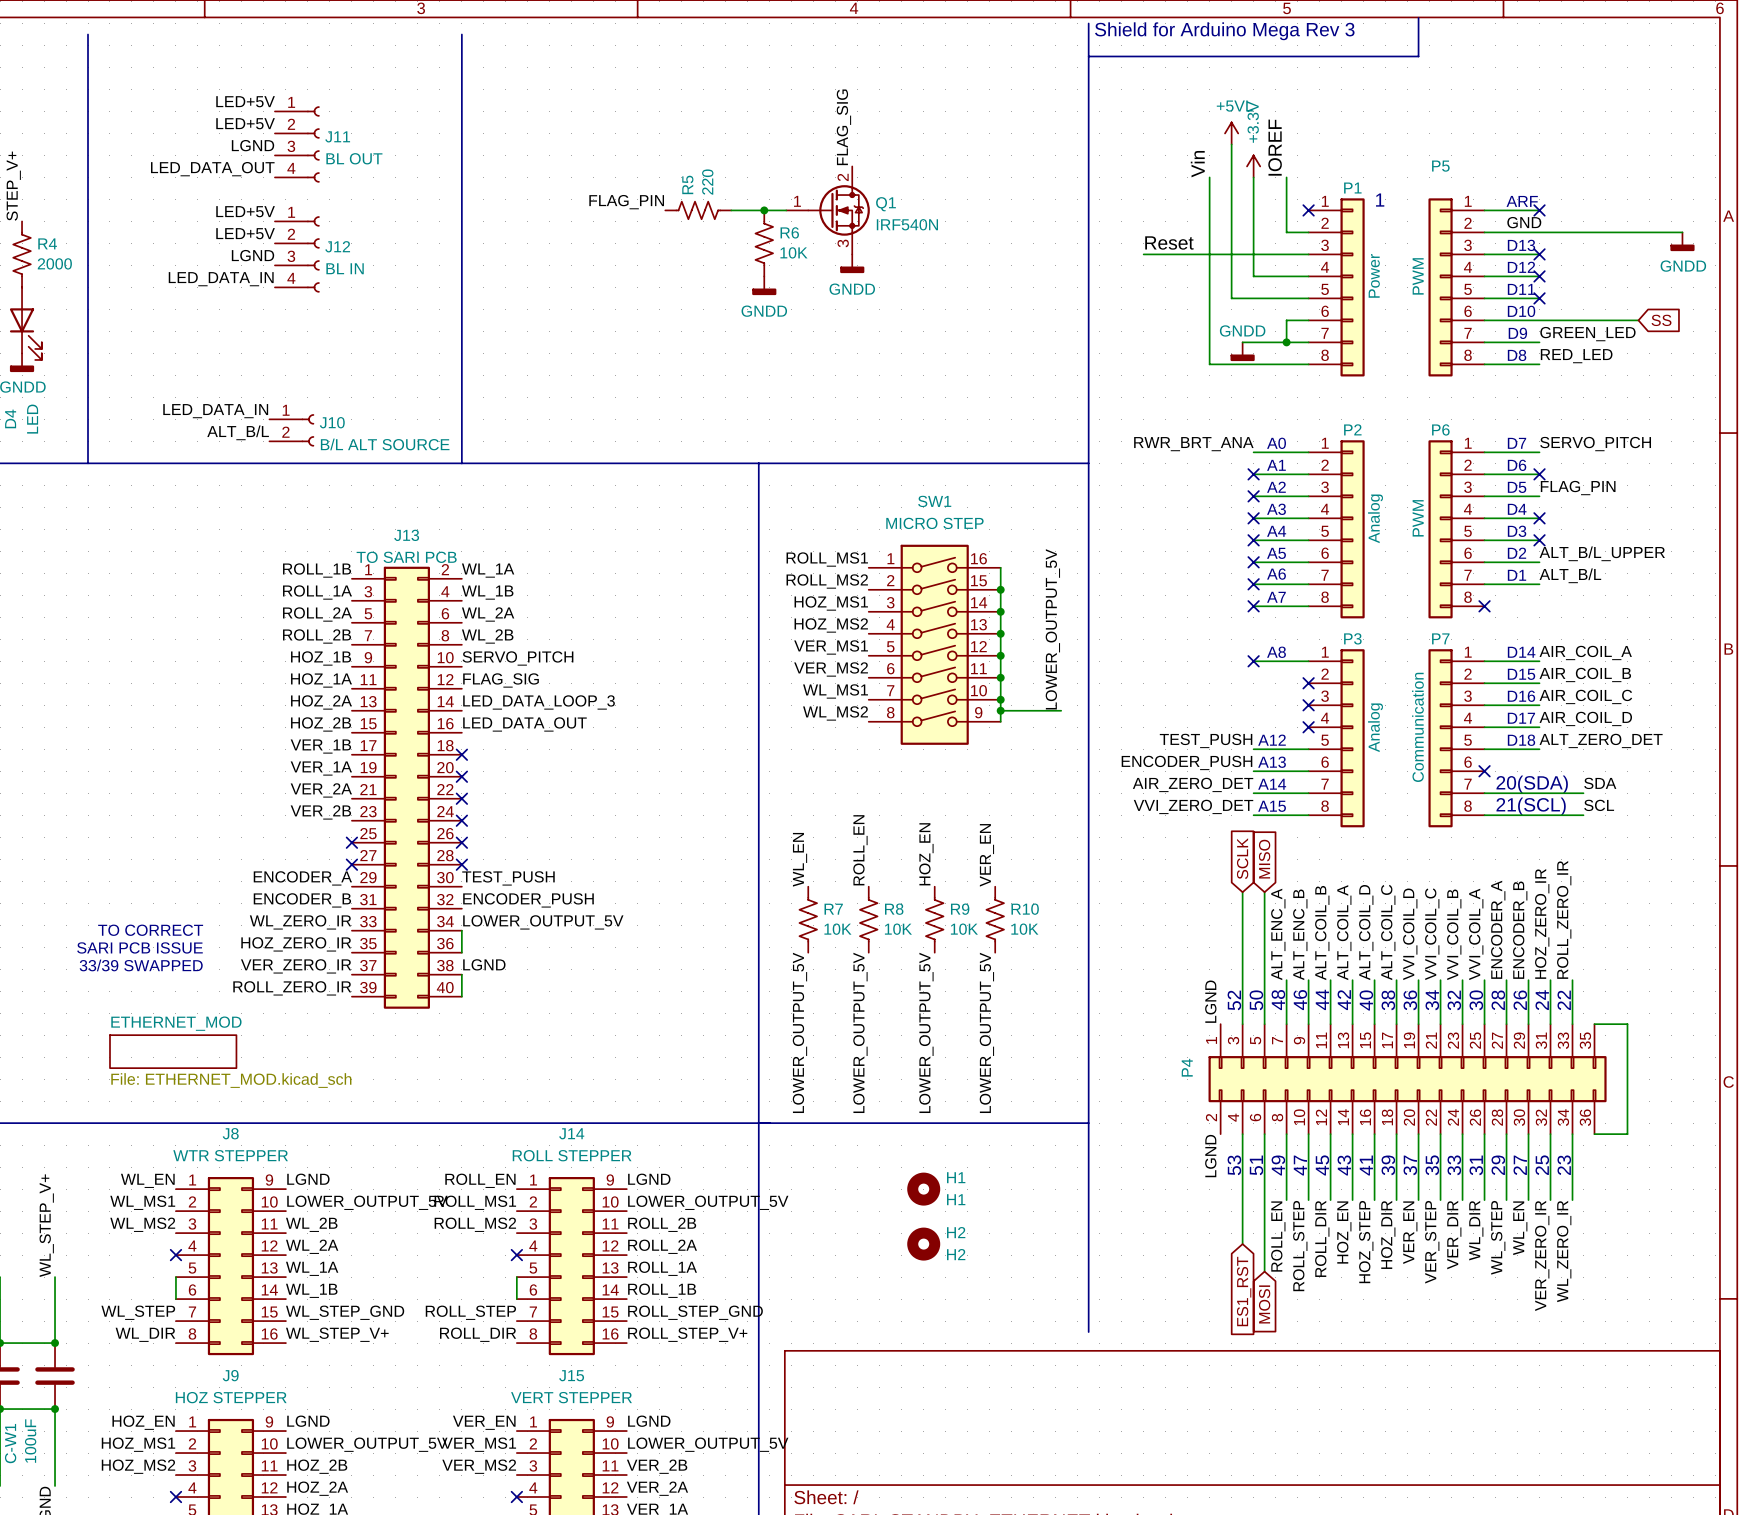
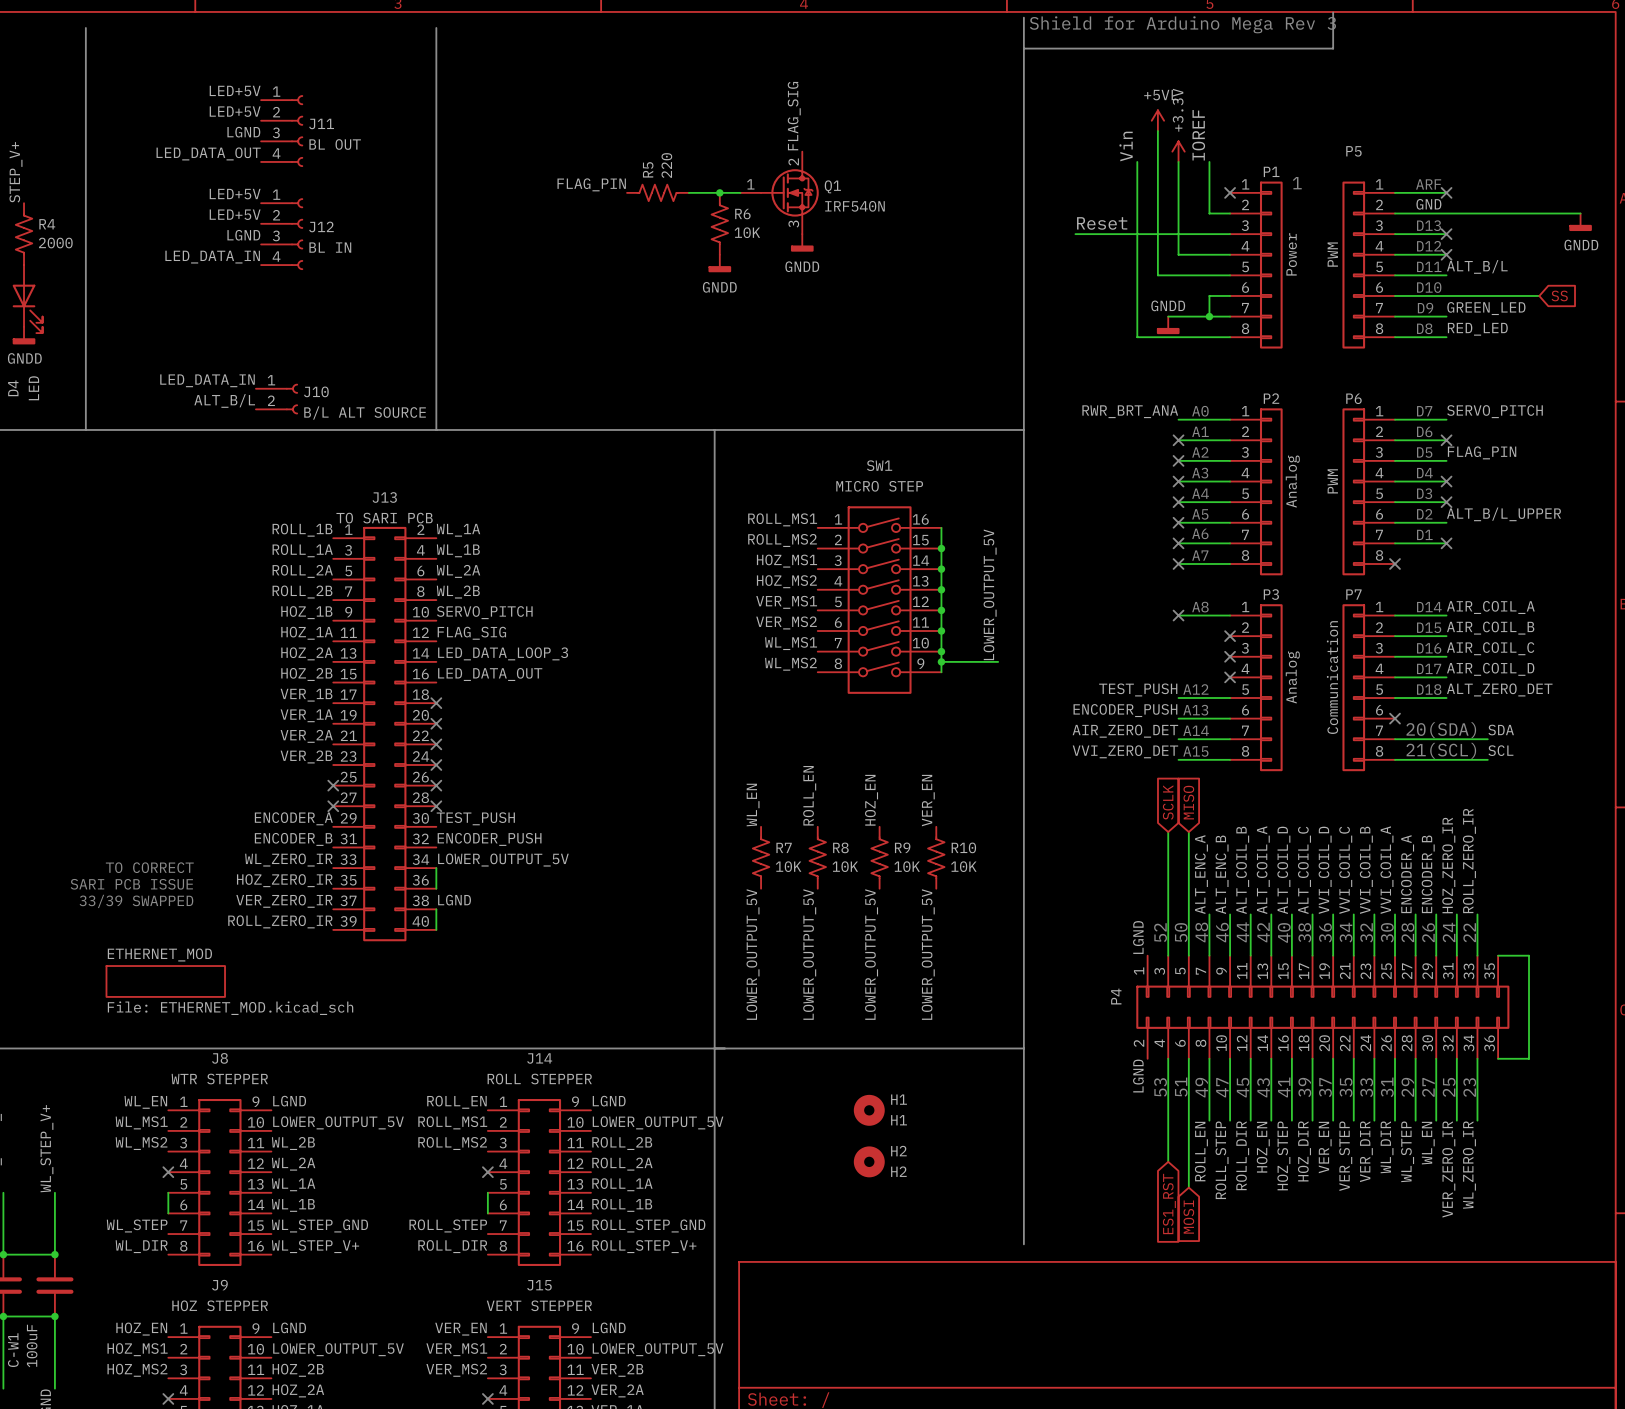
label: none -> ALT_B/L (1477, 266)
no-connect mark: (1539, 298) -> none
label: ALT_B/L (1570, 575) -> none
no-connect mark: none -> (1446, 543)

